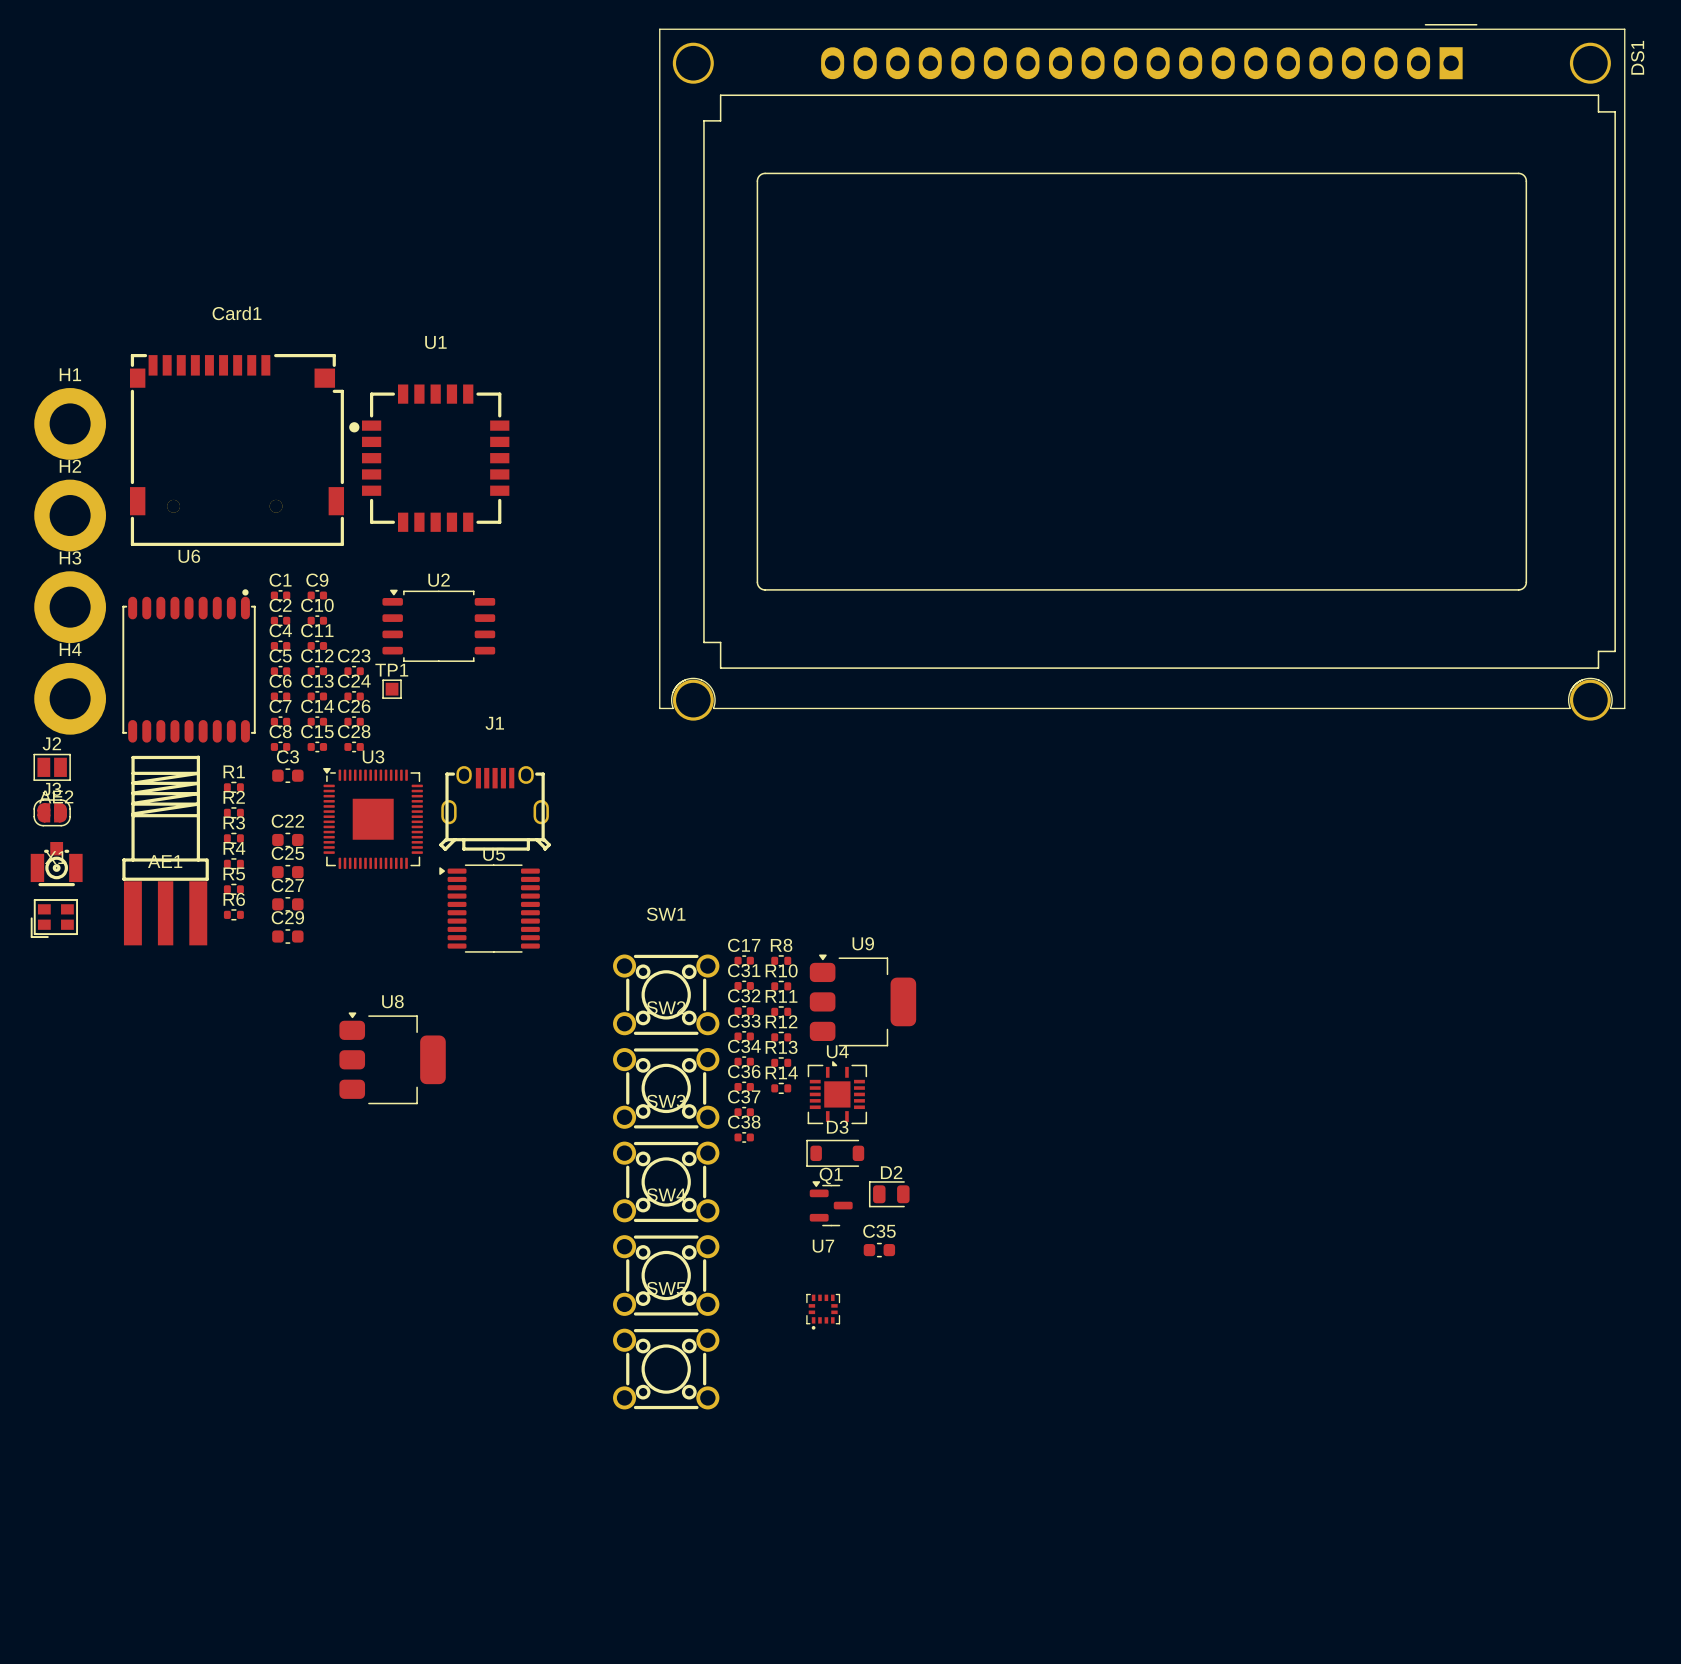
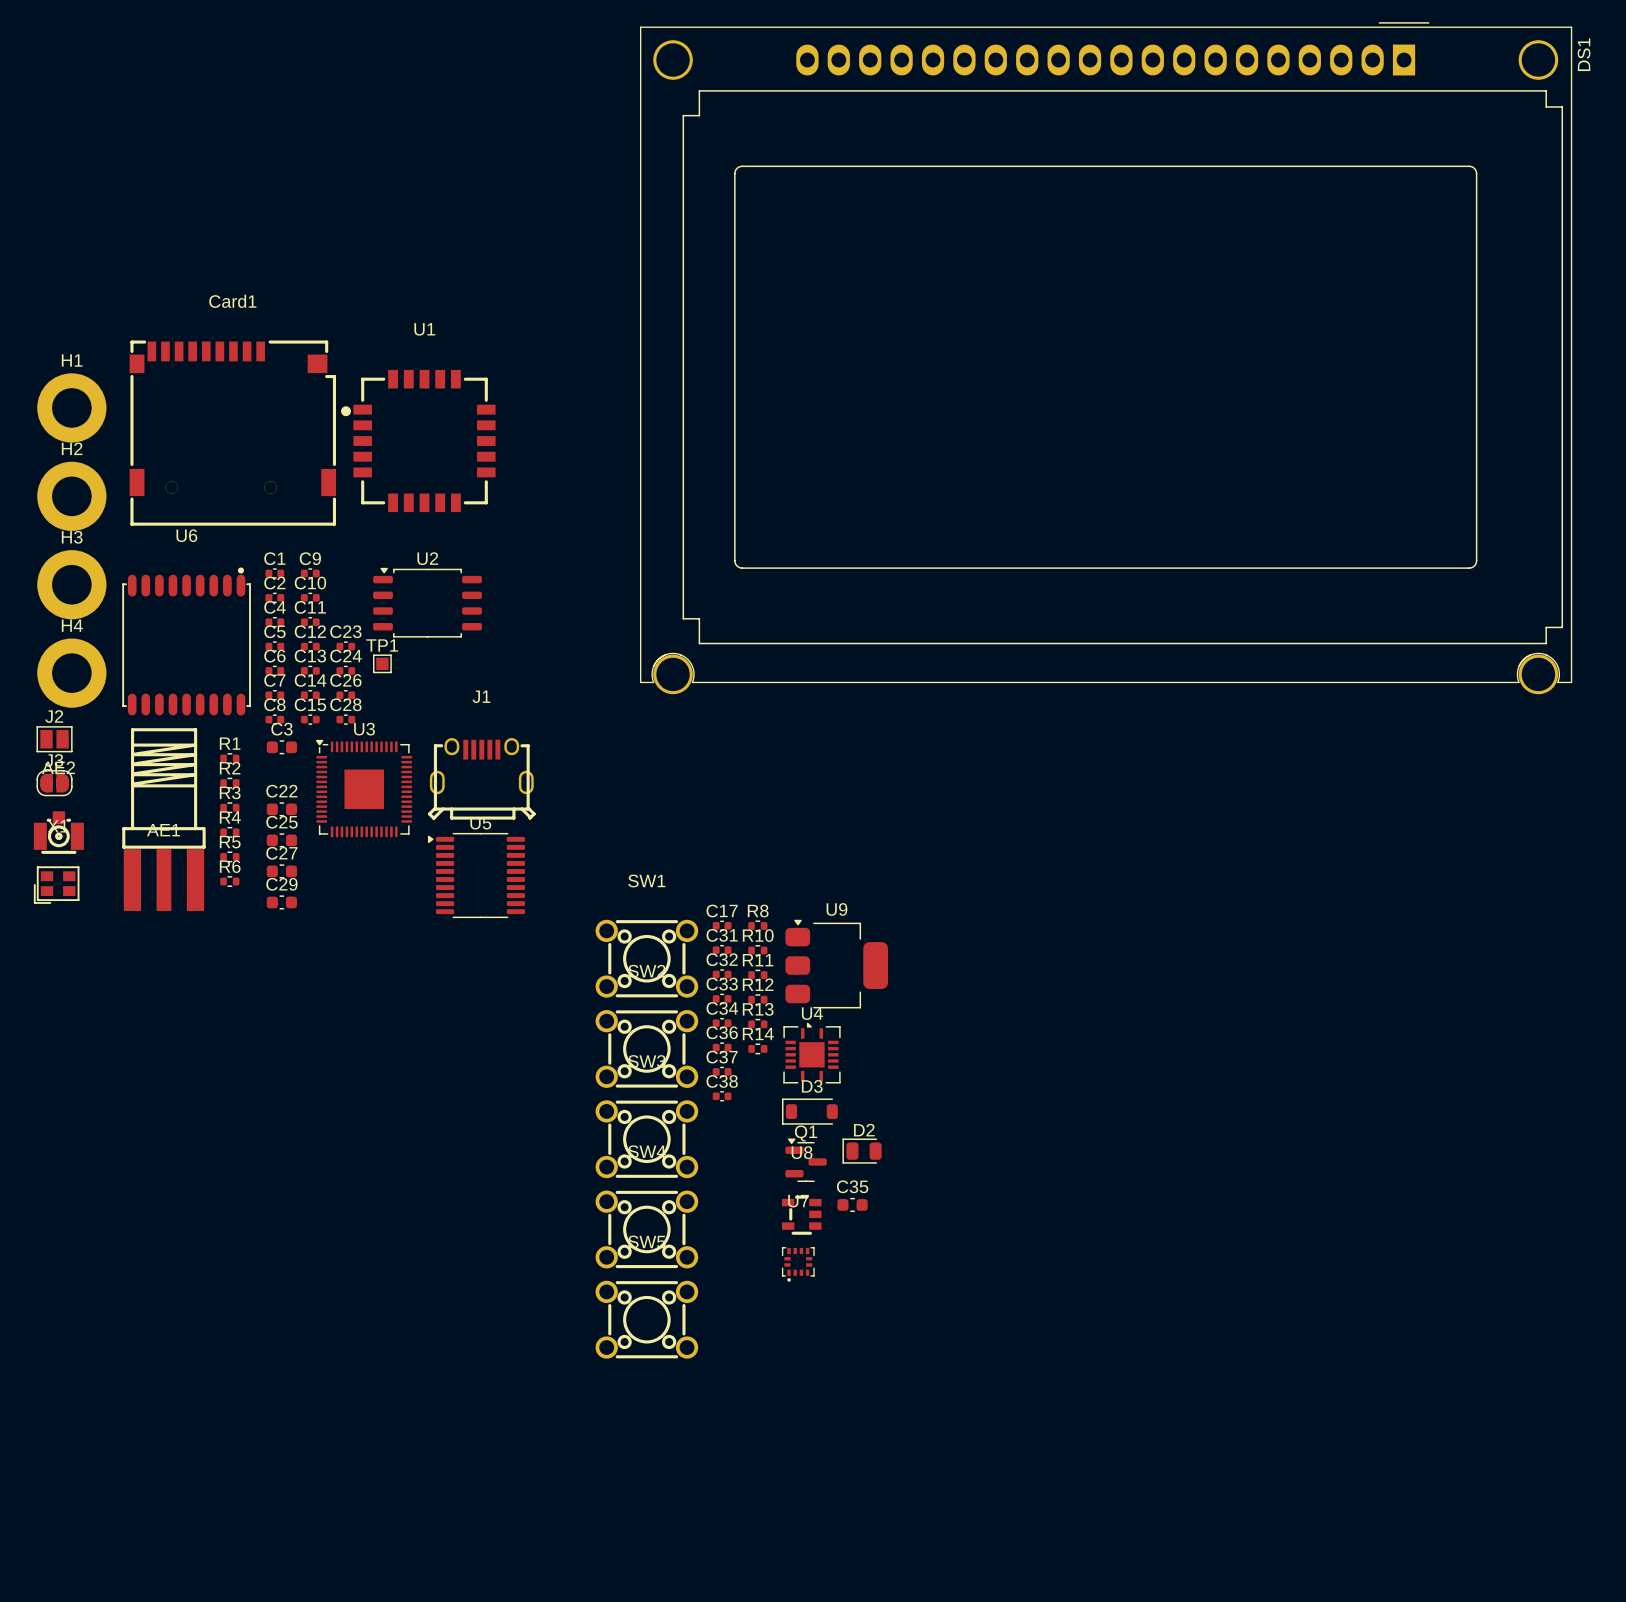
U8 footprint: [339, 1012, 446, 1105] -> [782, 1195, 822, 1235]

